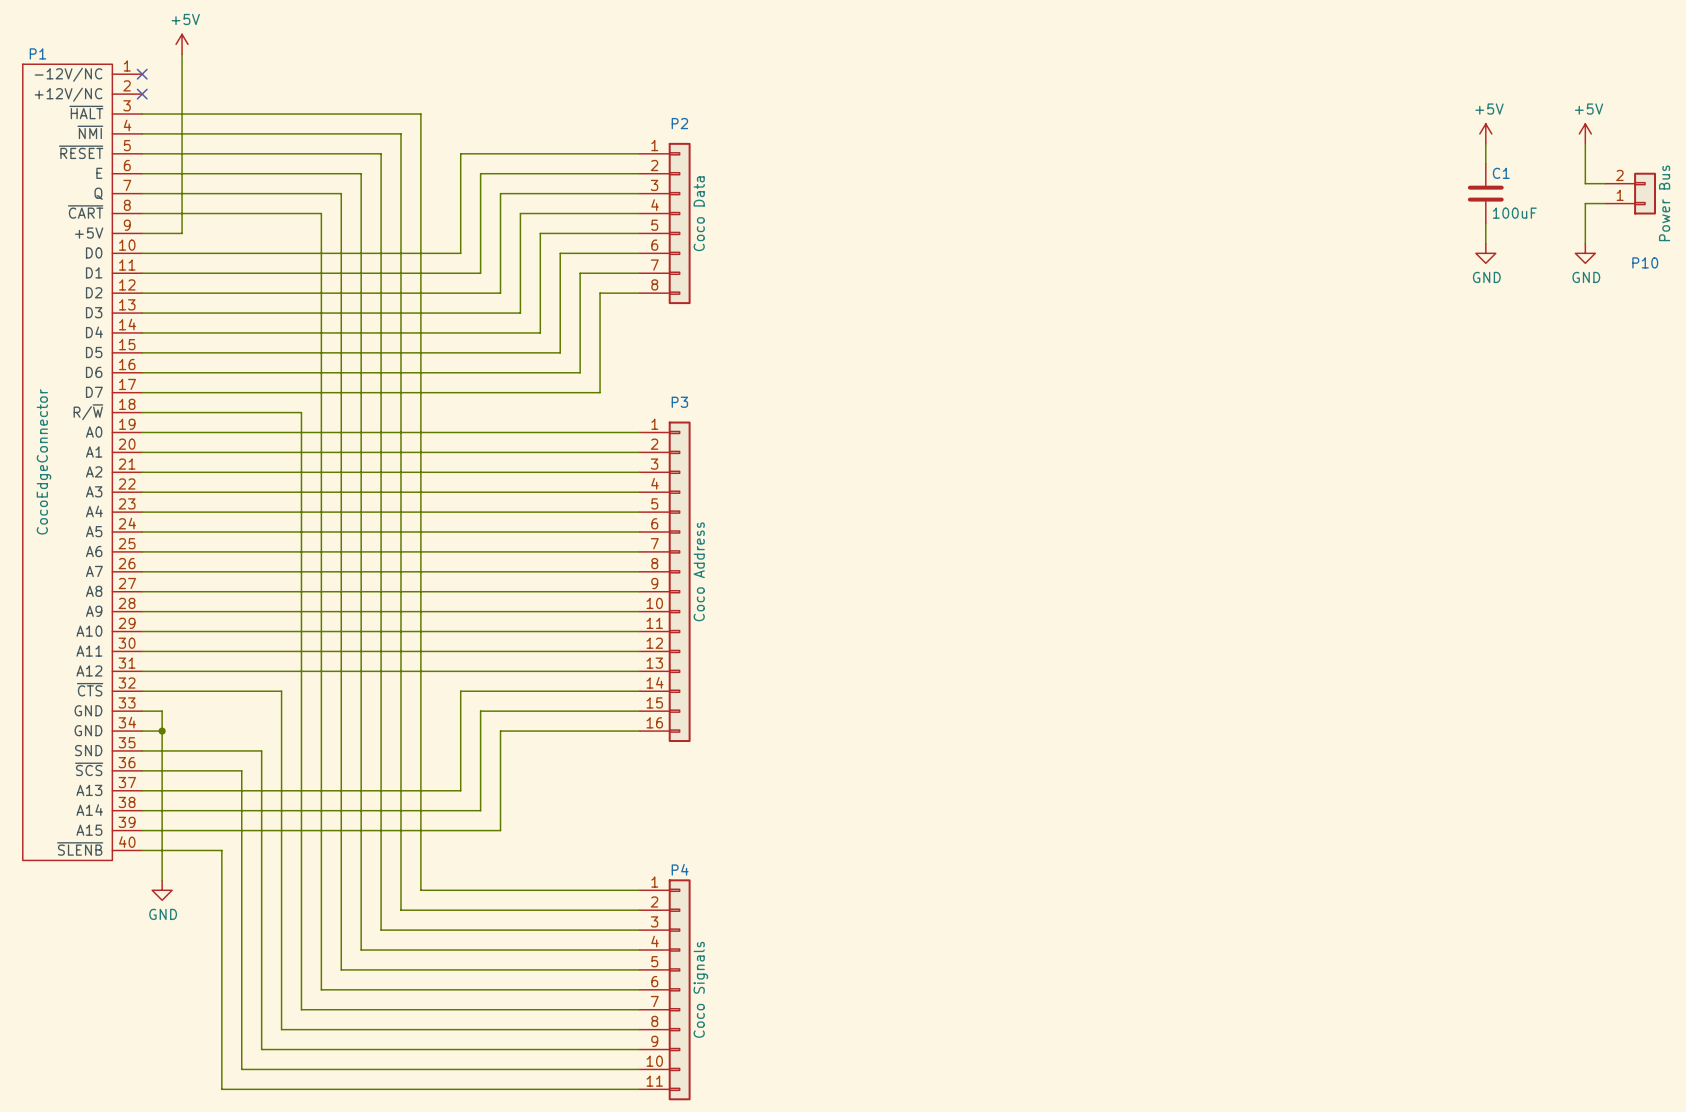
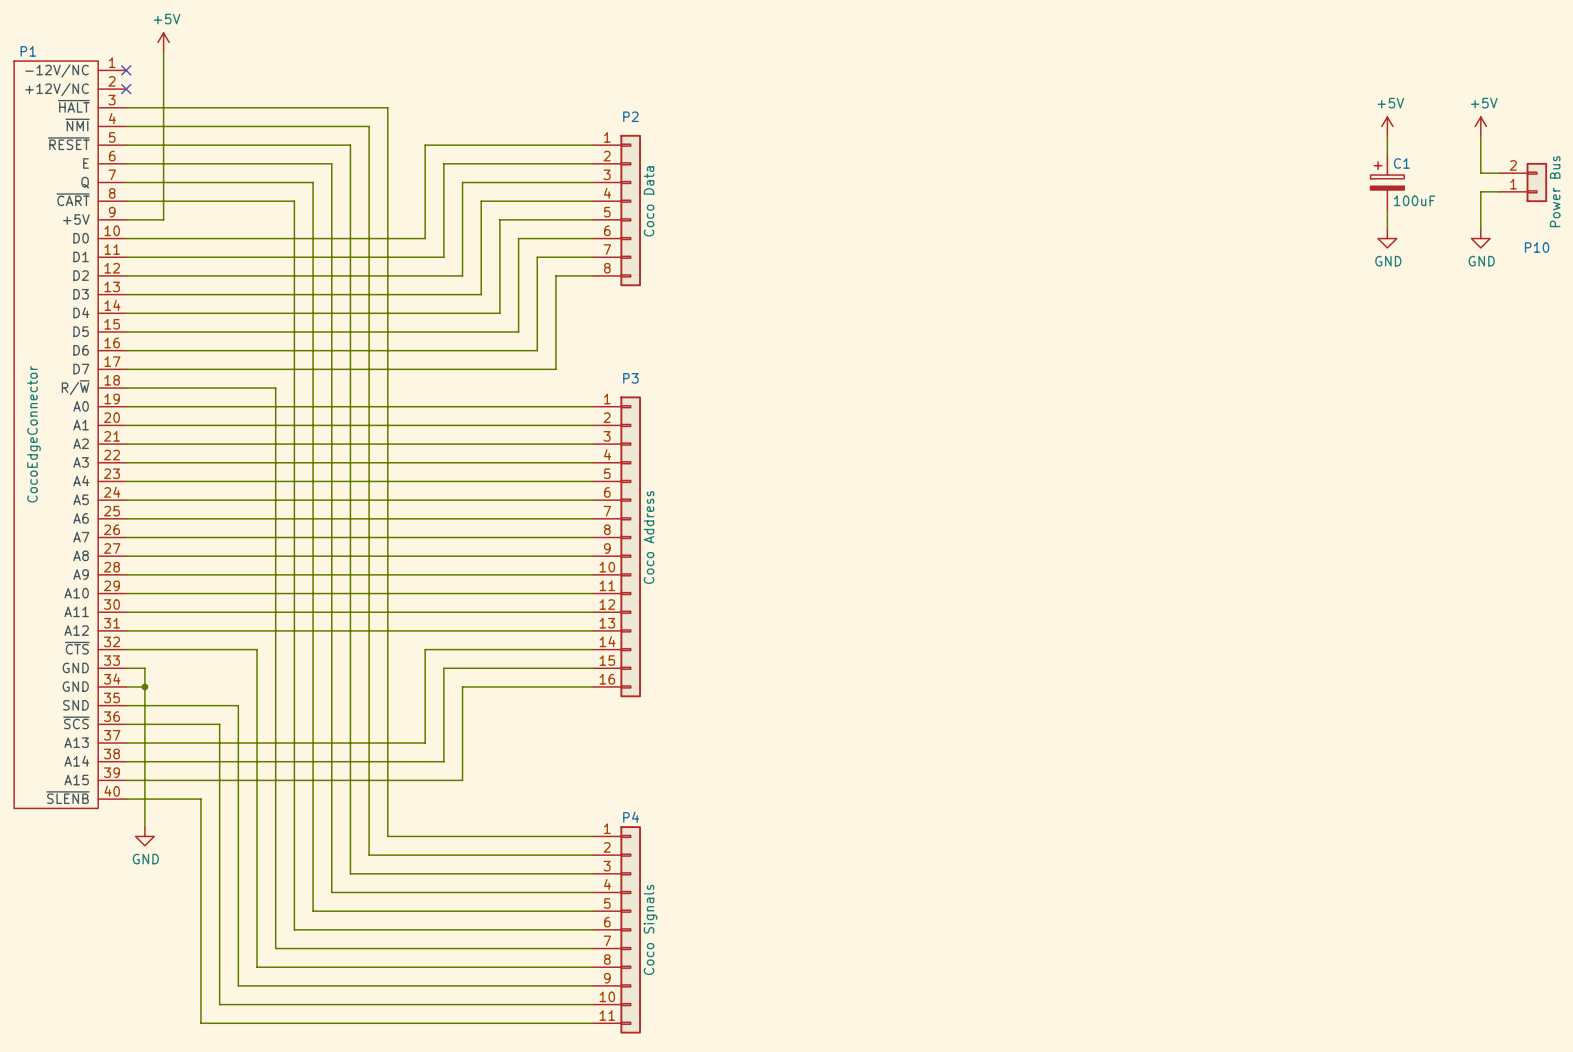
C1 symbol: [1467, 163, 1504, 224] -> [1370, 154, 1405, 211]

